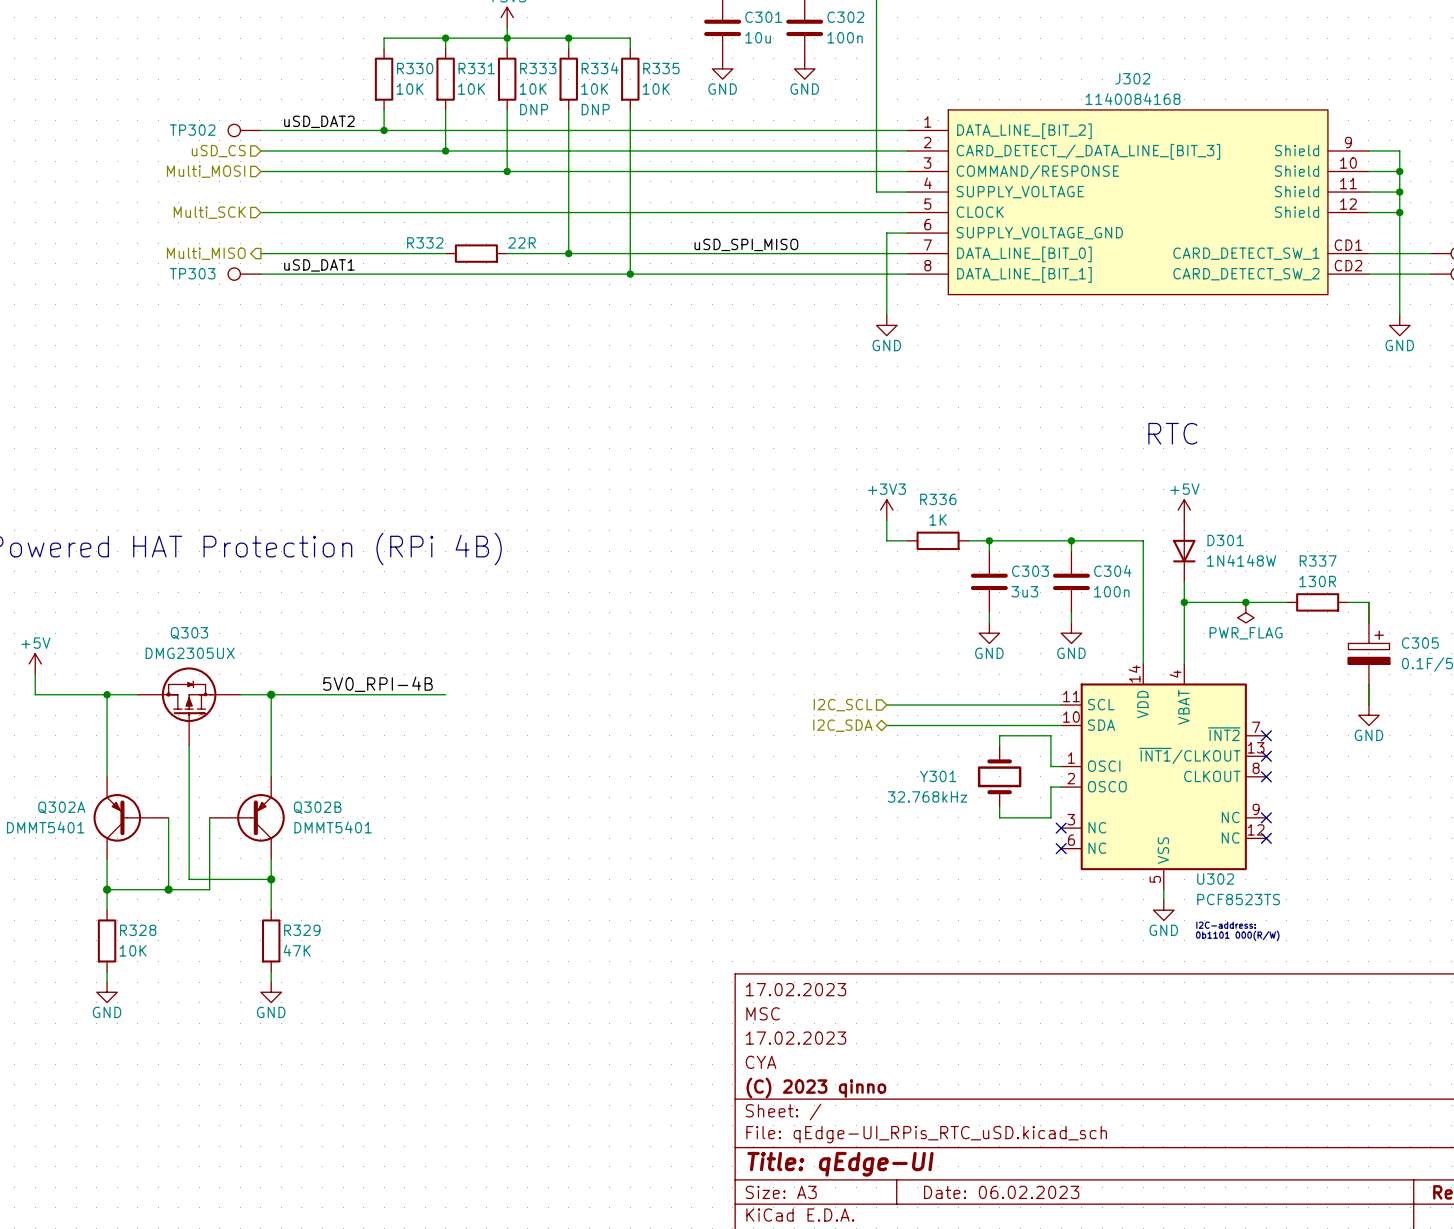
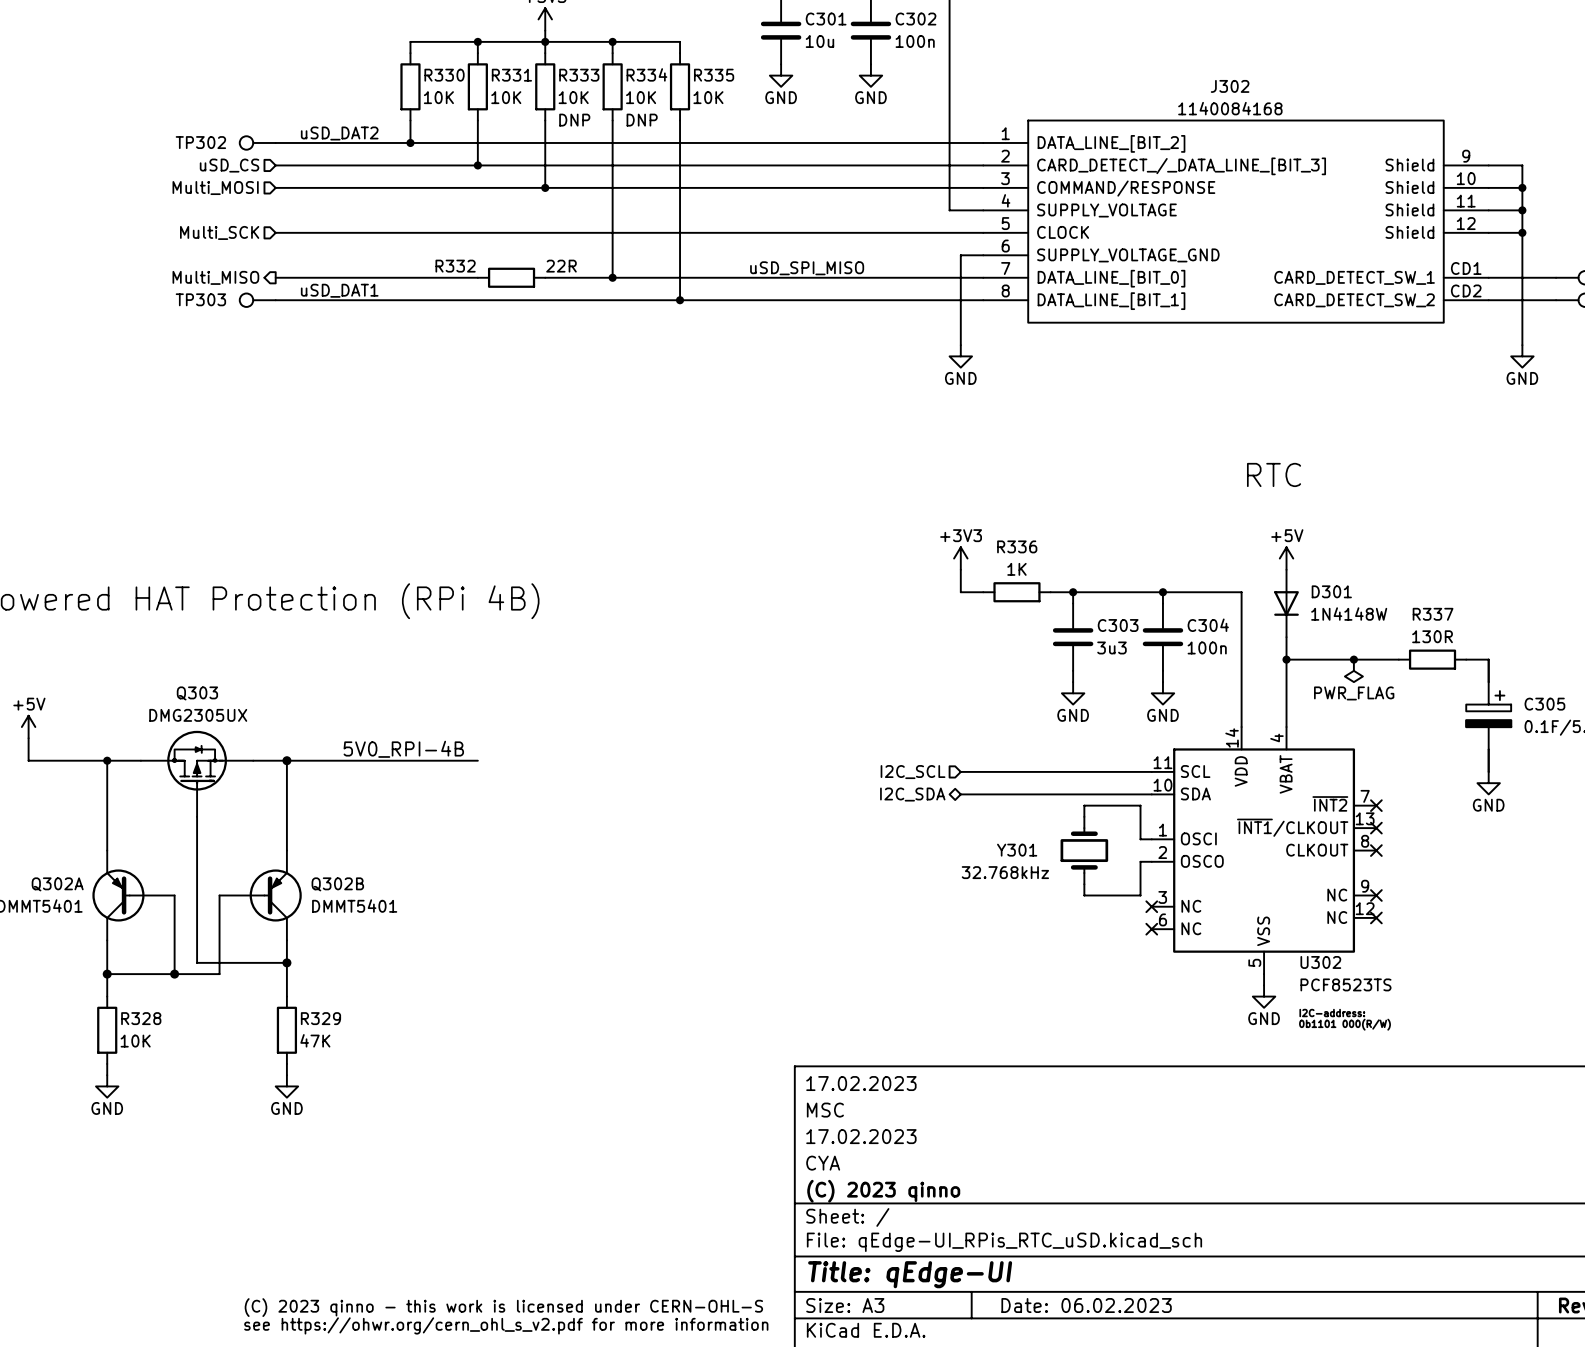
text: none -> (C) 2023 qinno - this work is licensed under CERN-OHL-S (503, 1307)
text: none -> see https://ohwr.org/cern_ohl_s_v2.pdf for more information (506, 1325)

